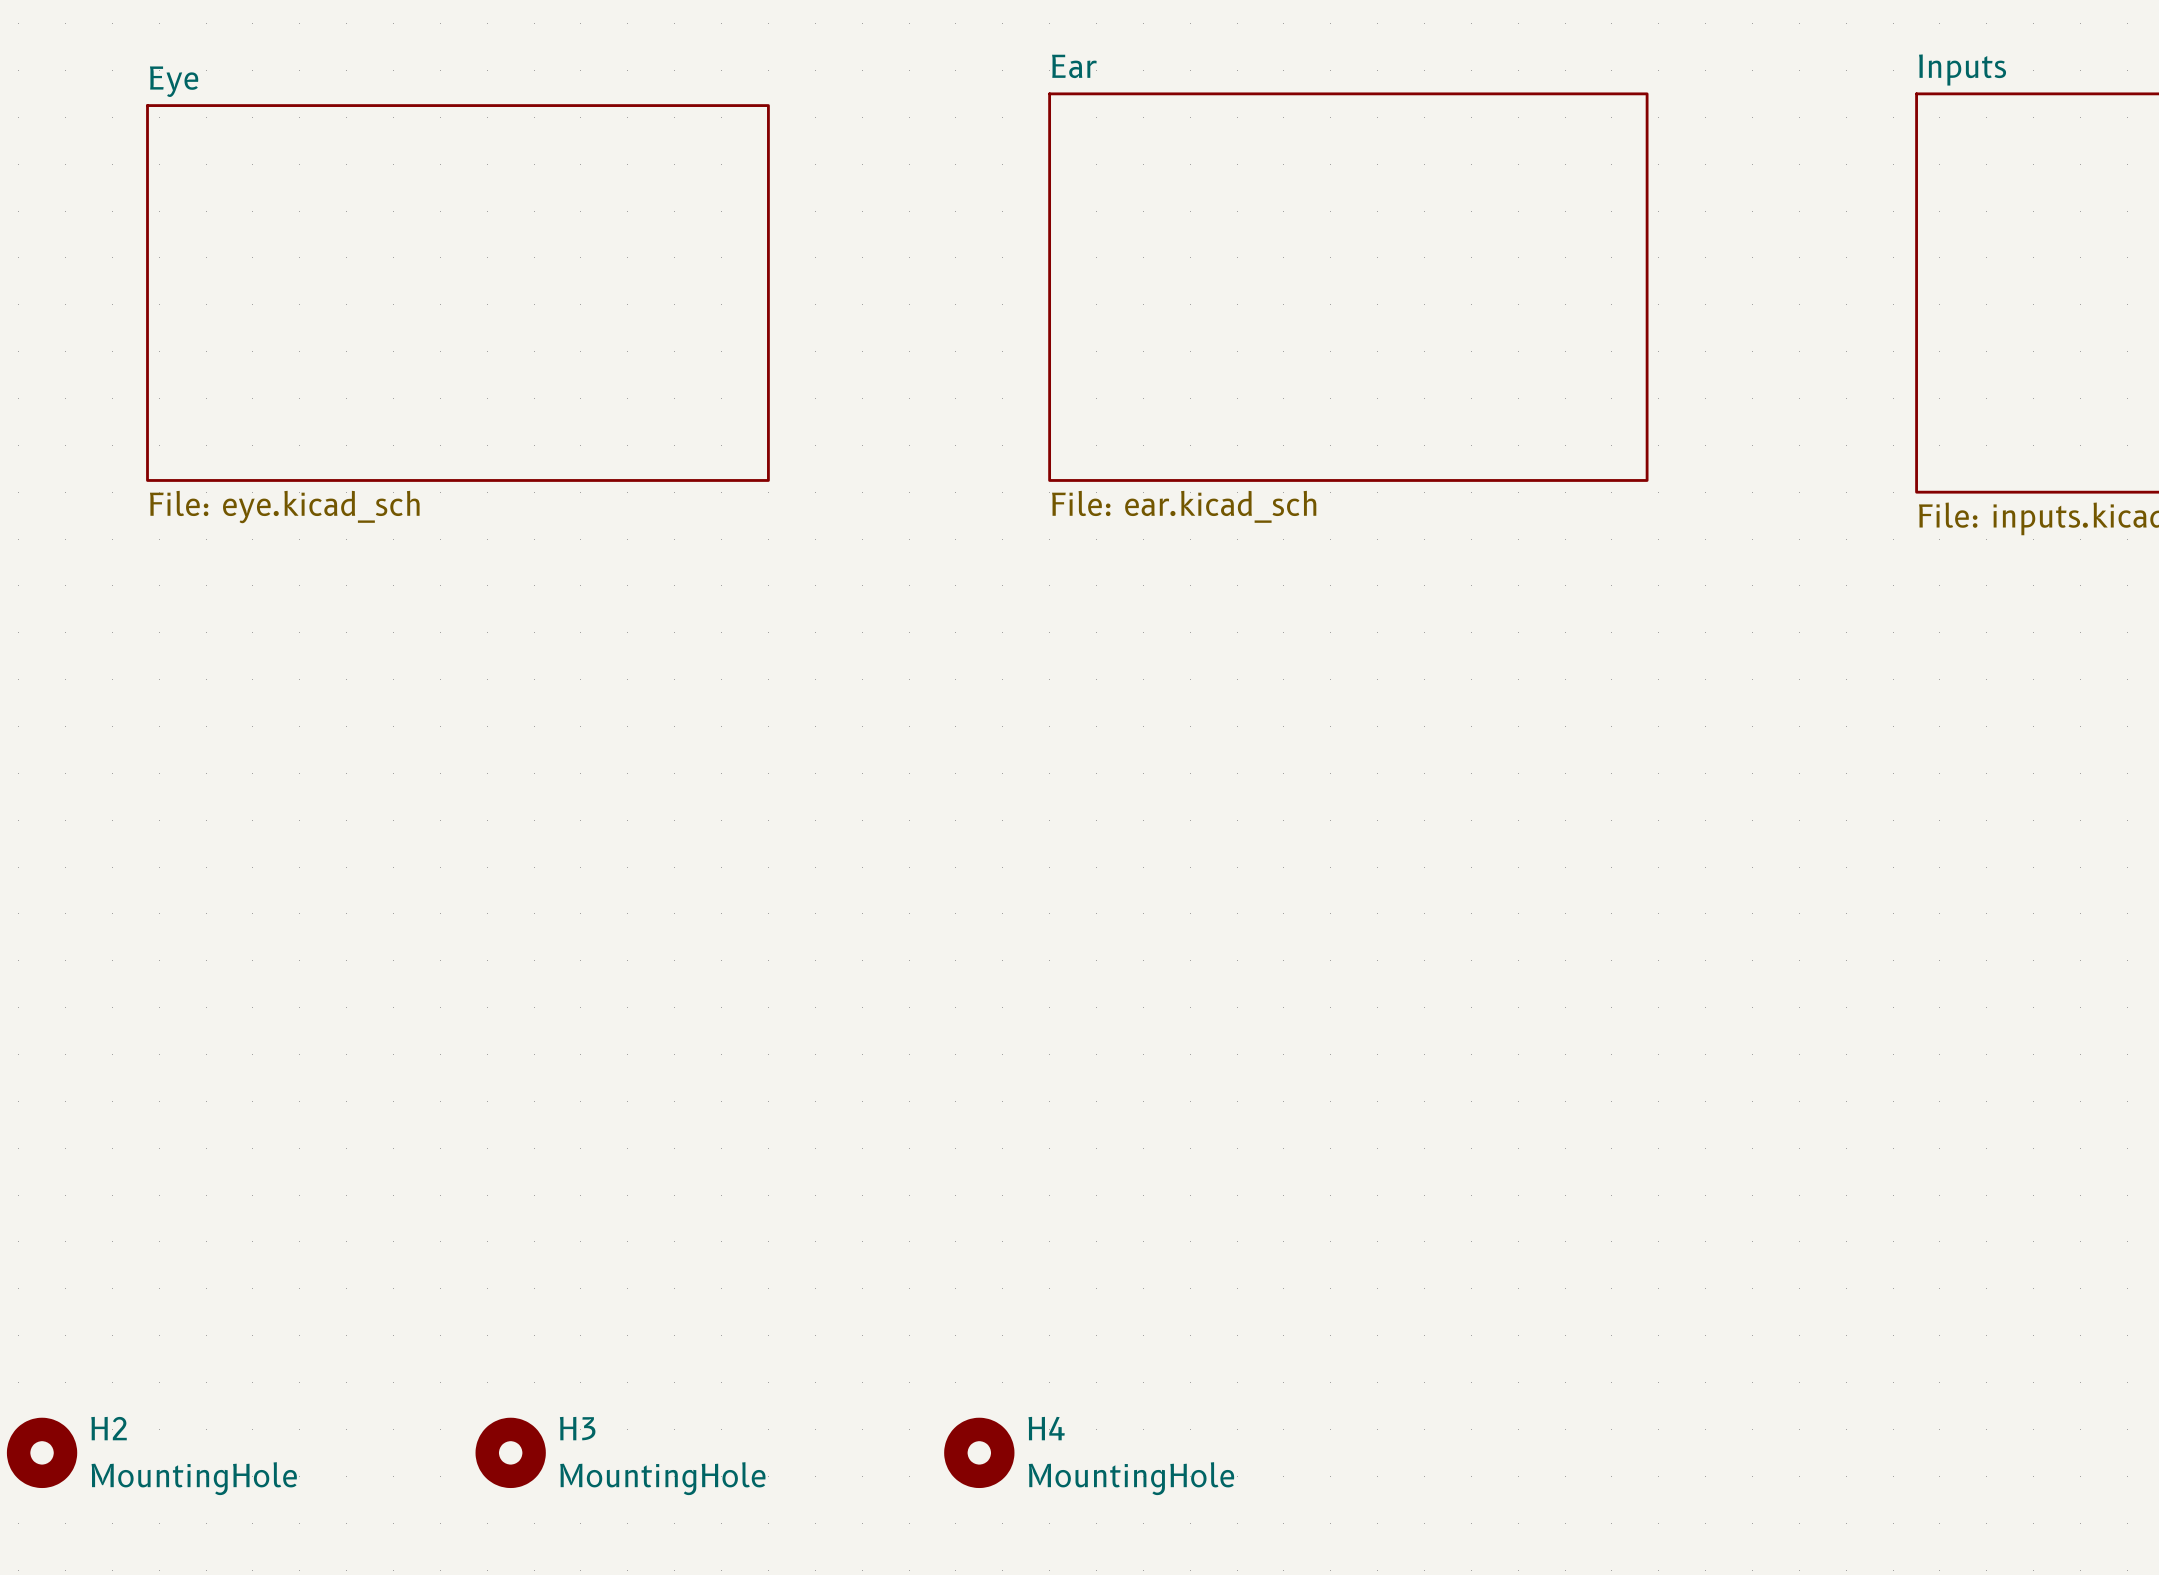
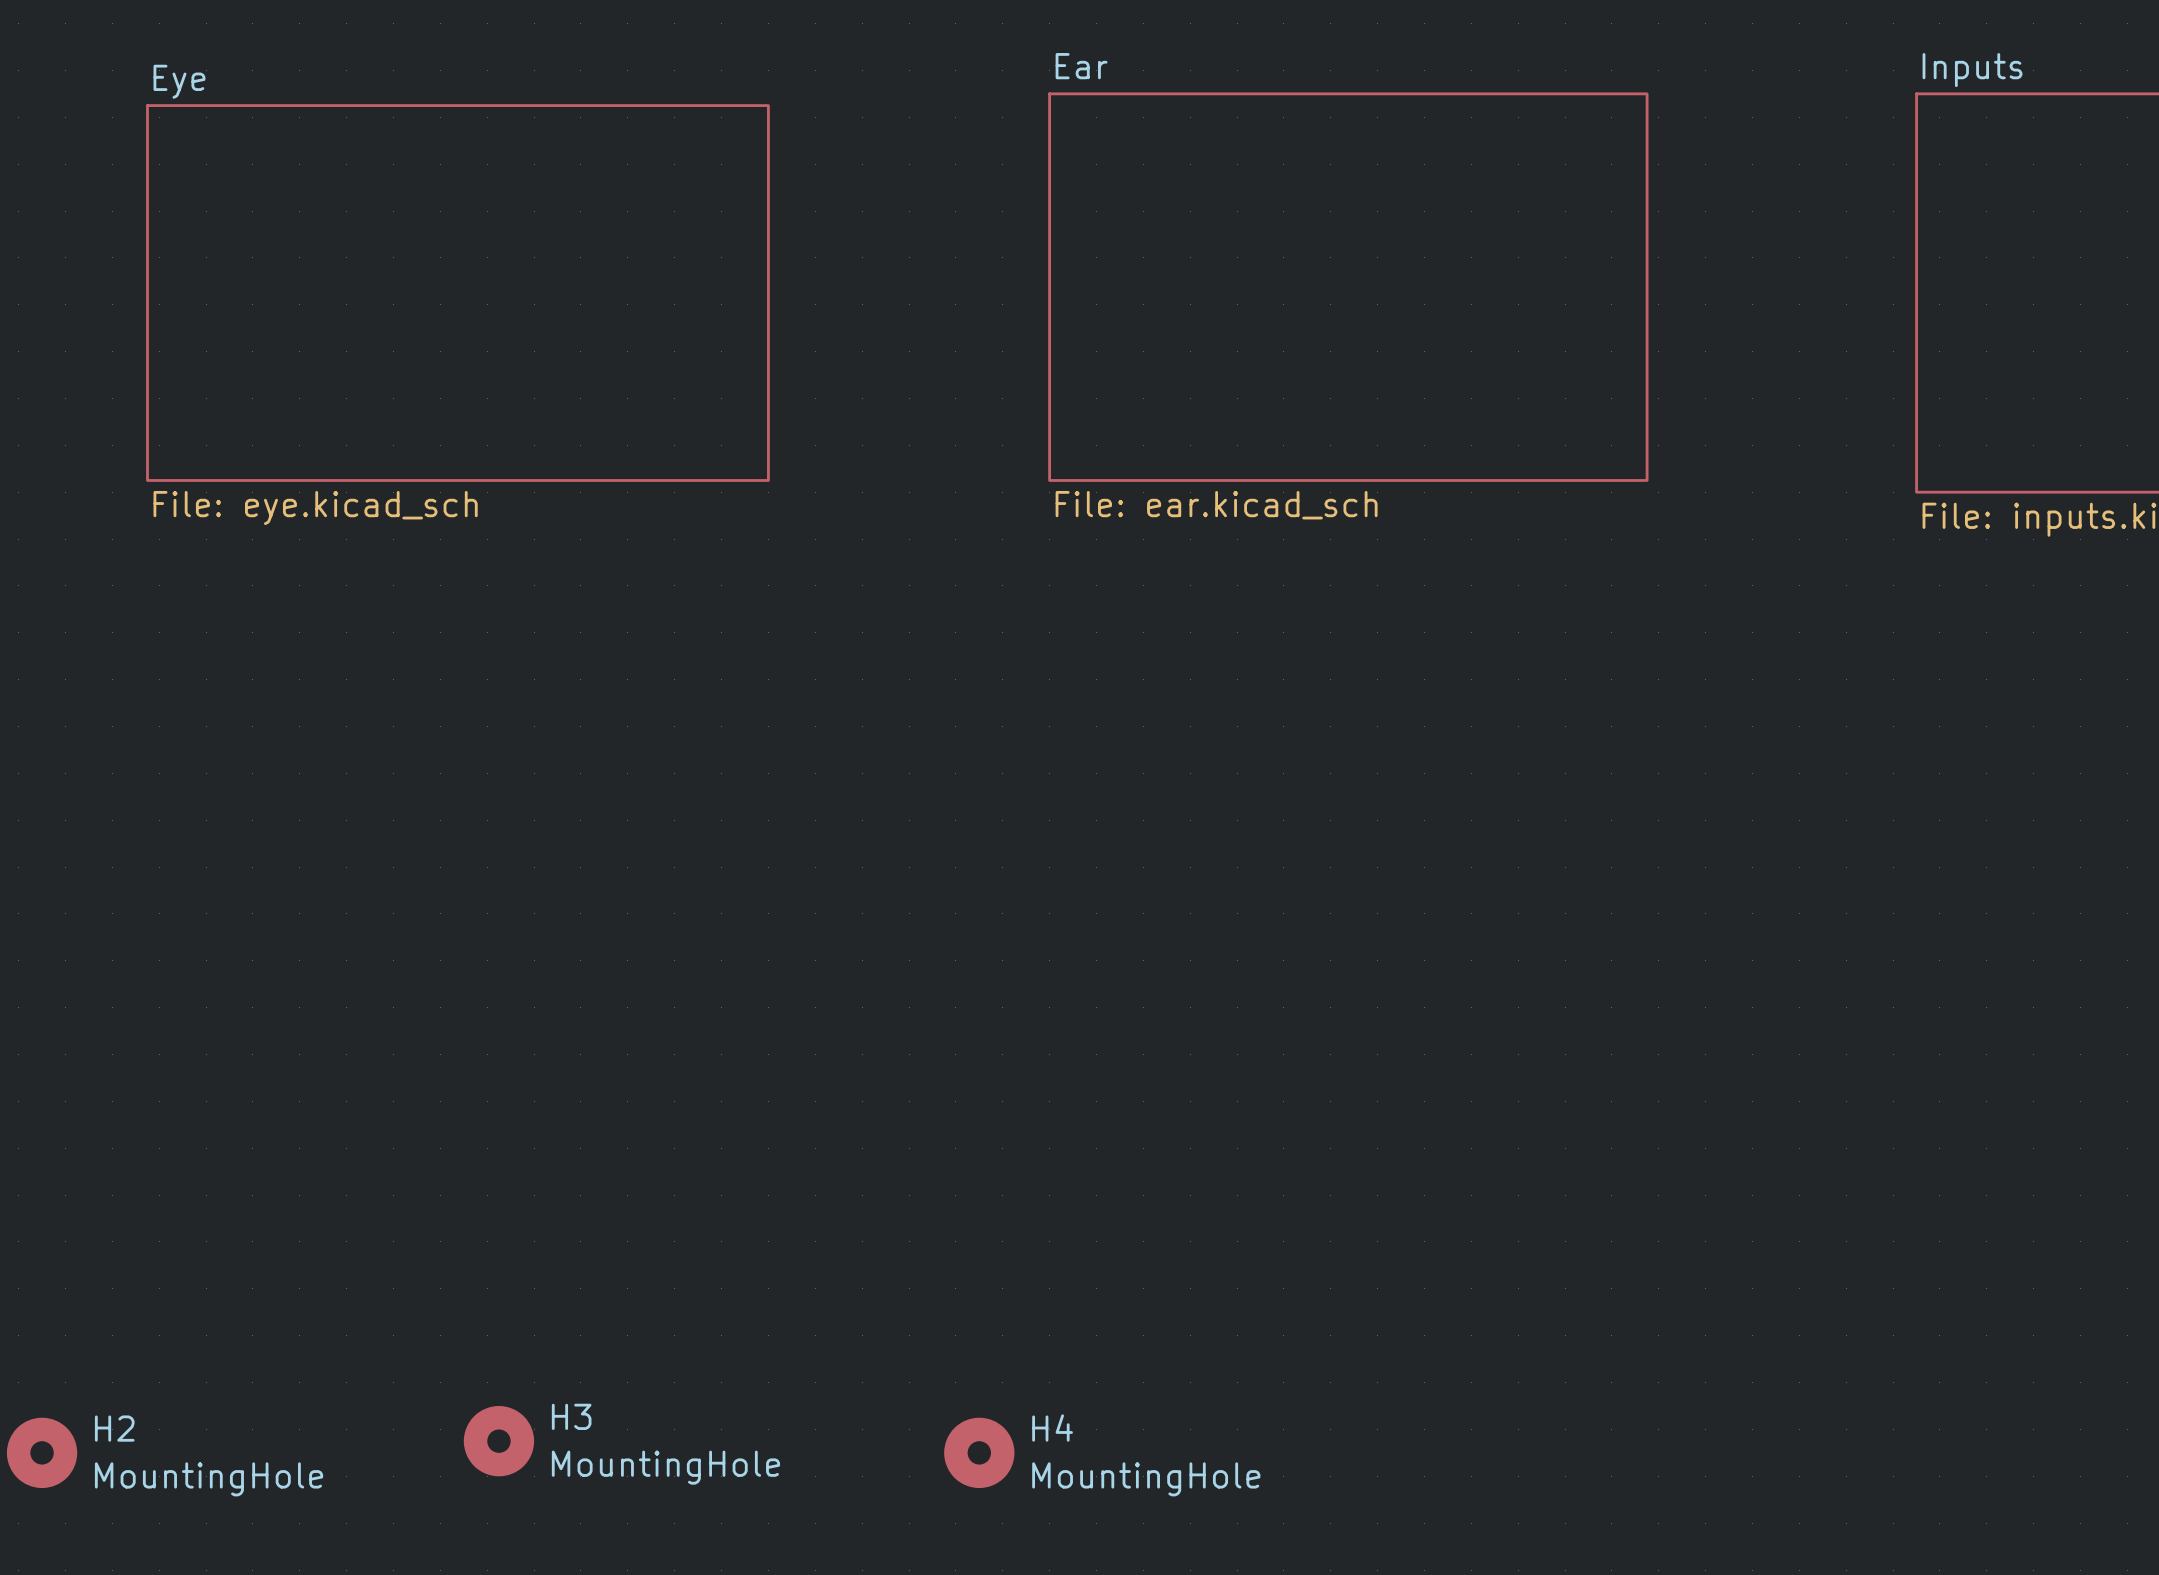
H3 position: (510, 1452) -> (498, 1441)

